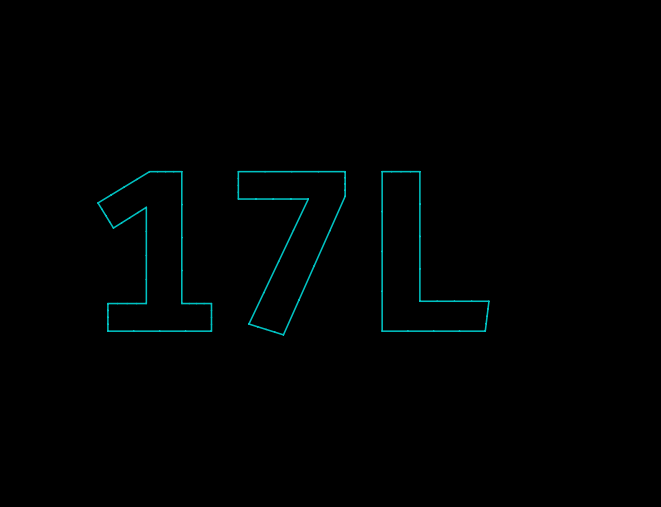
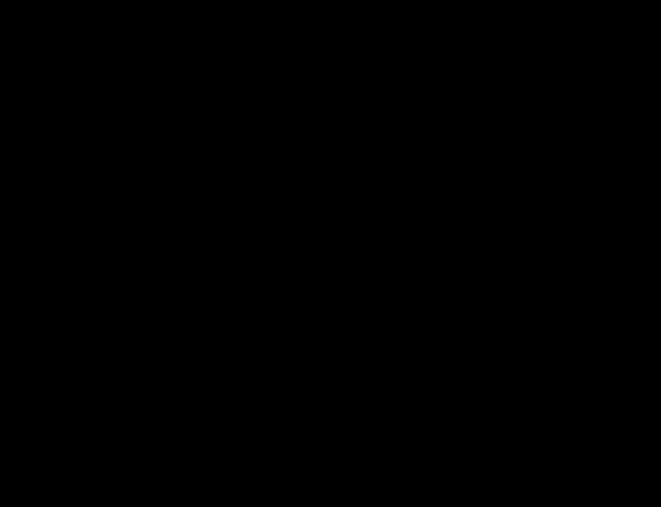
line: (149, 171) (181, 171) (181, 303) (211, 303) (211, 331) (107, 331) (107, 303) (146, 303) (146, 207) (113, 228) (98, 202) (149, 171) -> none
line: (238, 171) (345, 171) (345, 196) (283, 334) (248, 324) (308, 199) (238, 199) (238, 171) -> none
line: (382, 171) (382, 331) (485, 331) (488, 301) (419, 301) (419, 171) (382, 171) -> none

